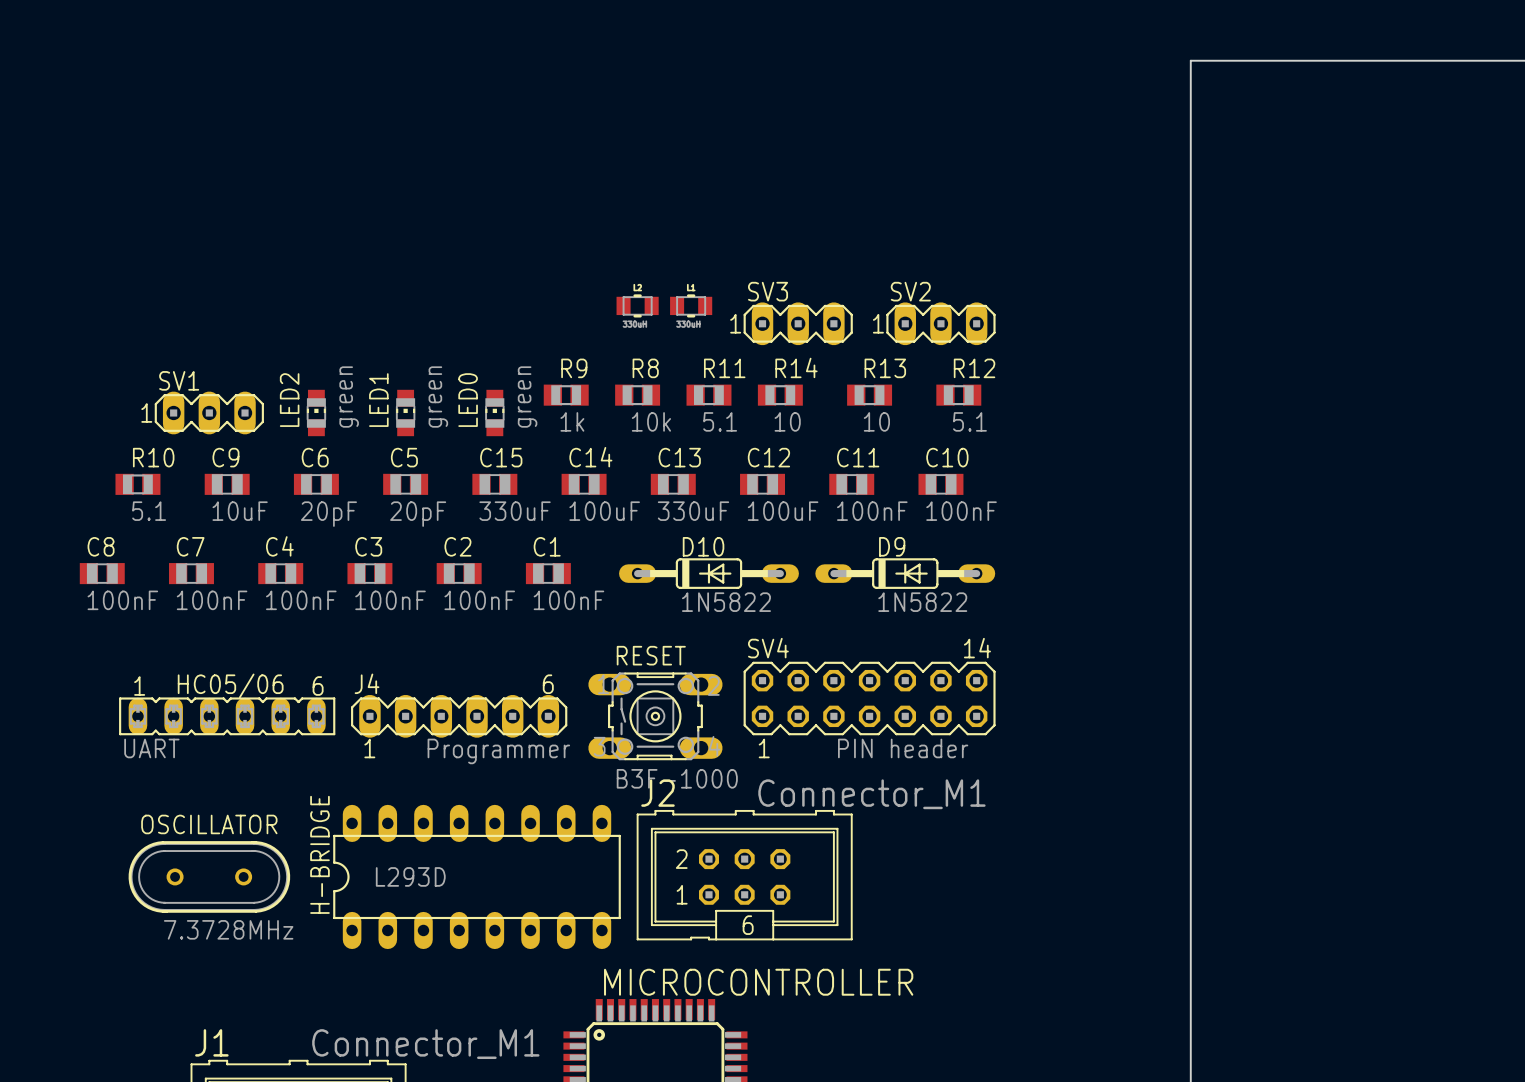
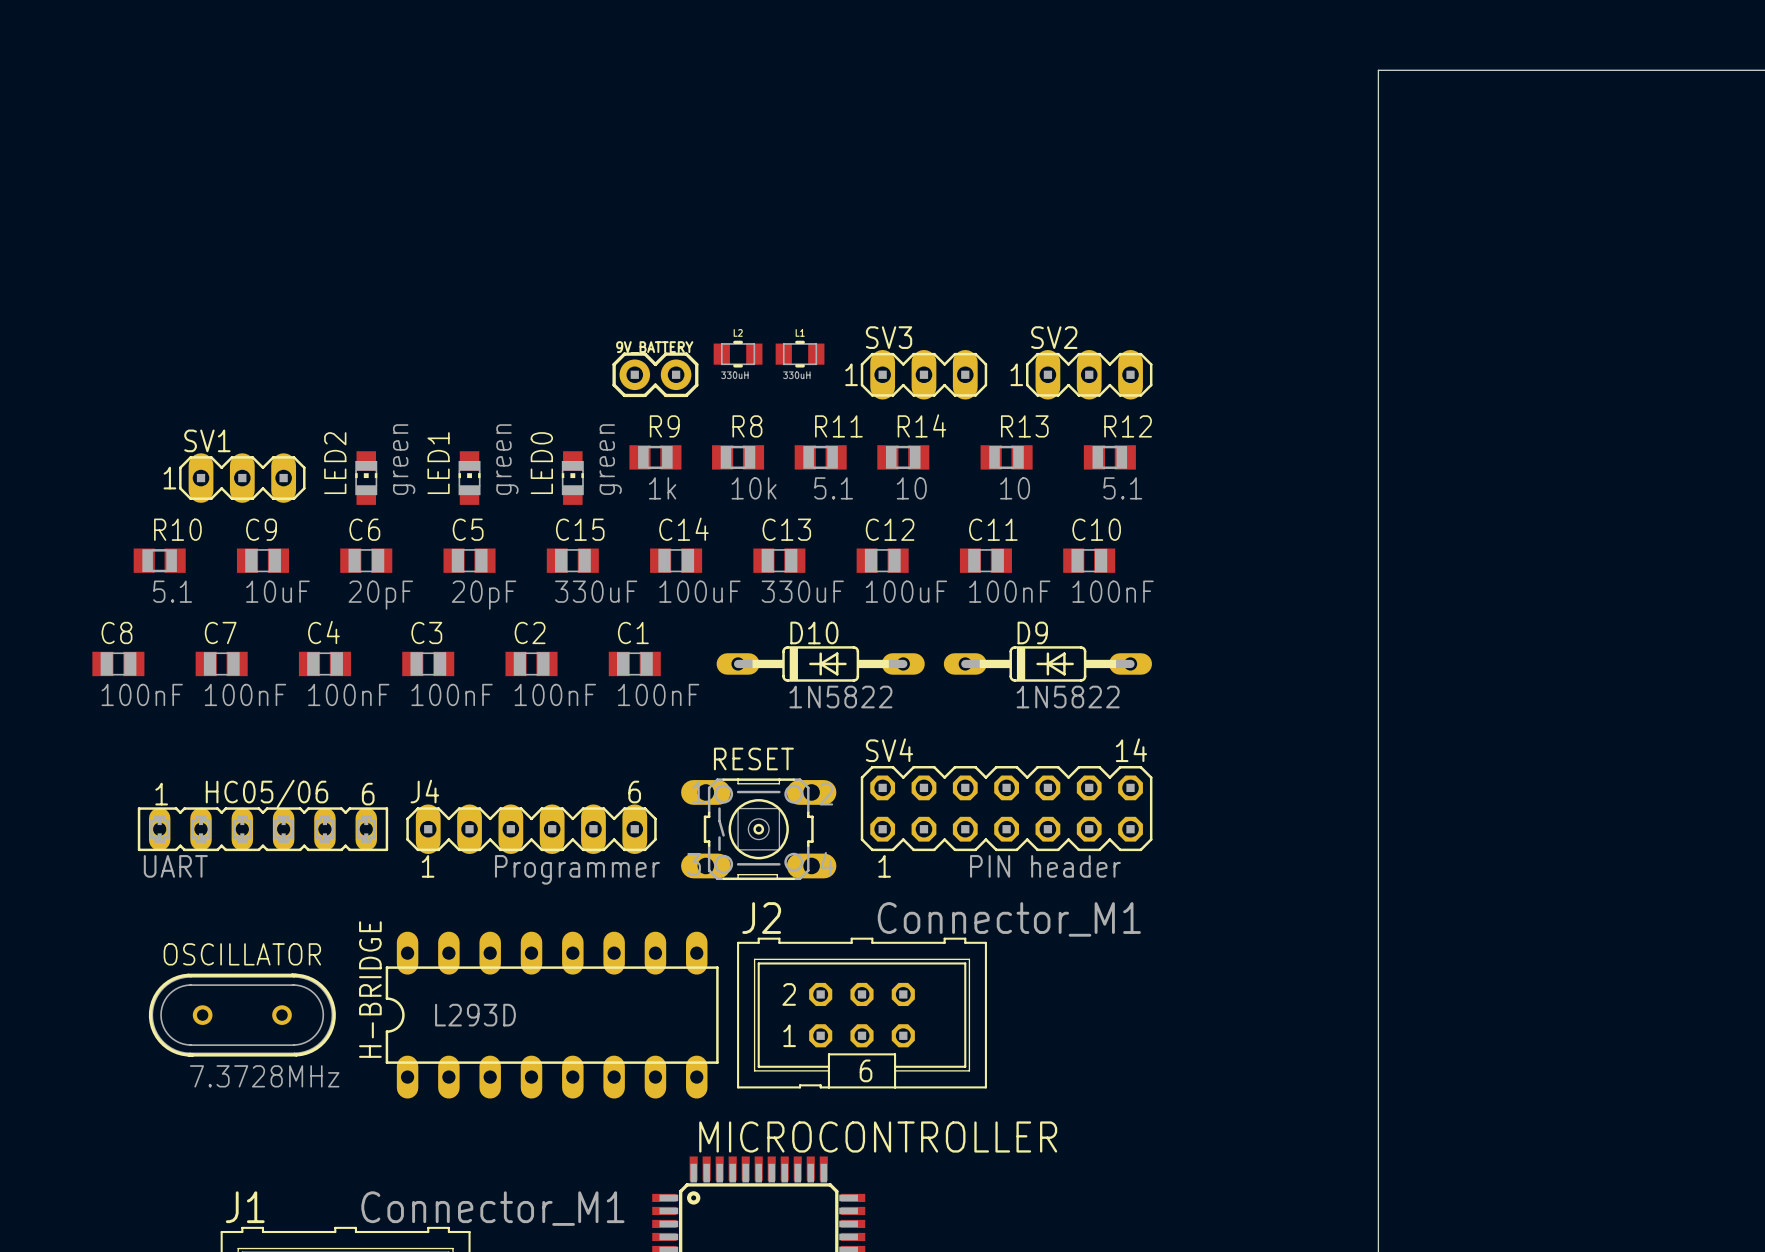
9V_BATTERY: none -> (655, 374)
RESET value: B3F-1000 (677, 778) -> none

